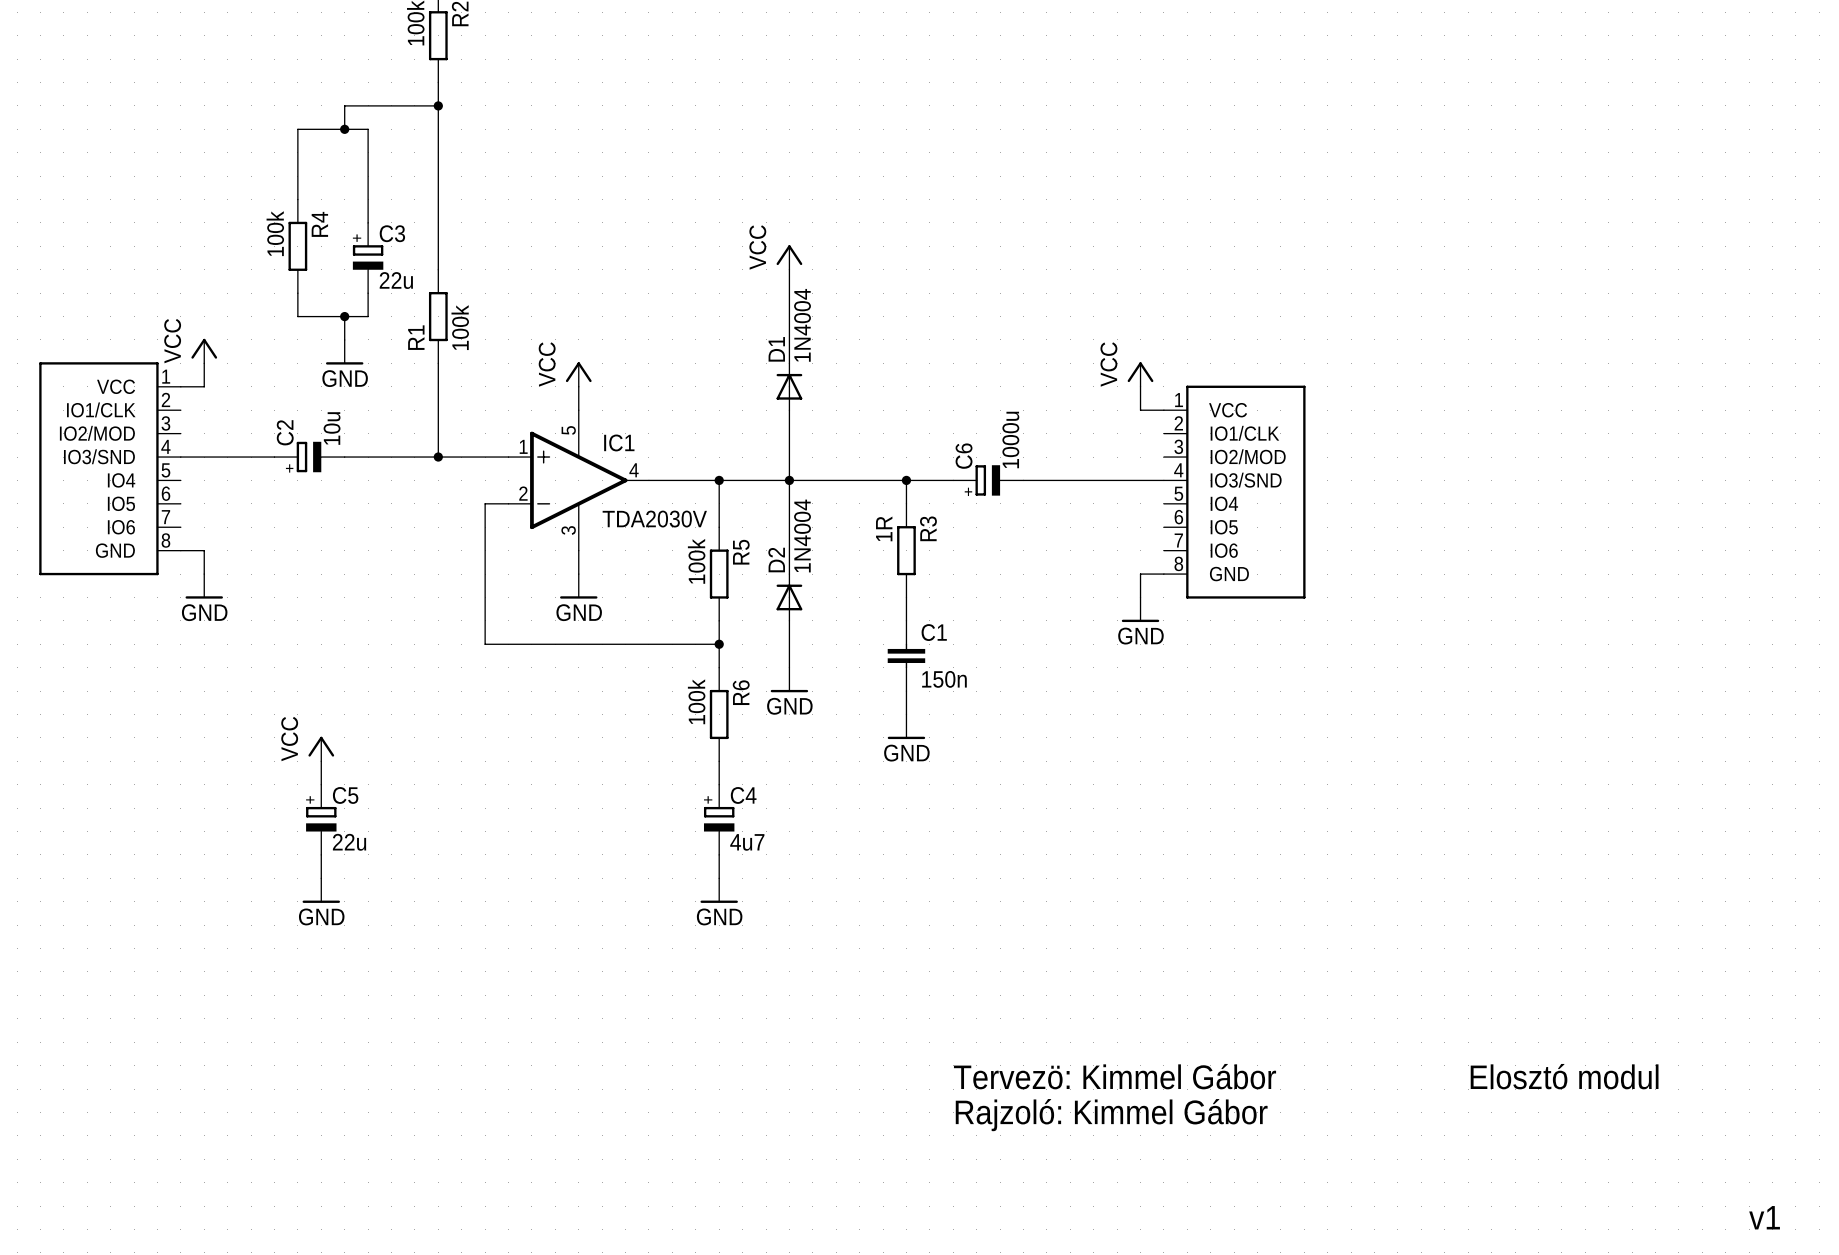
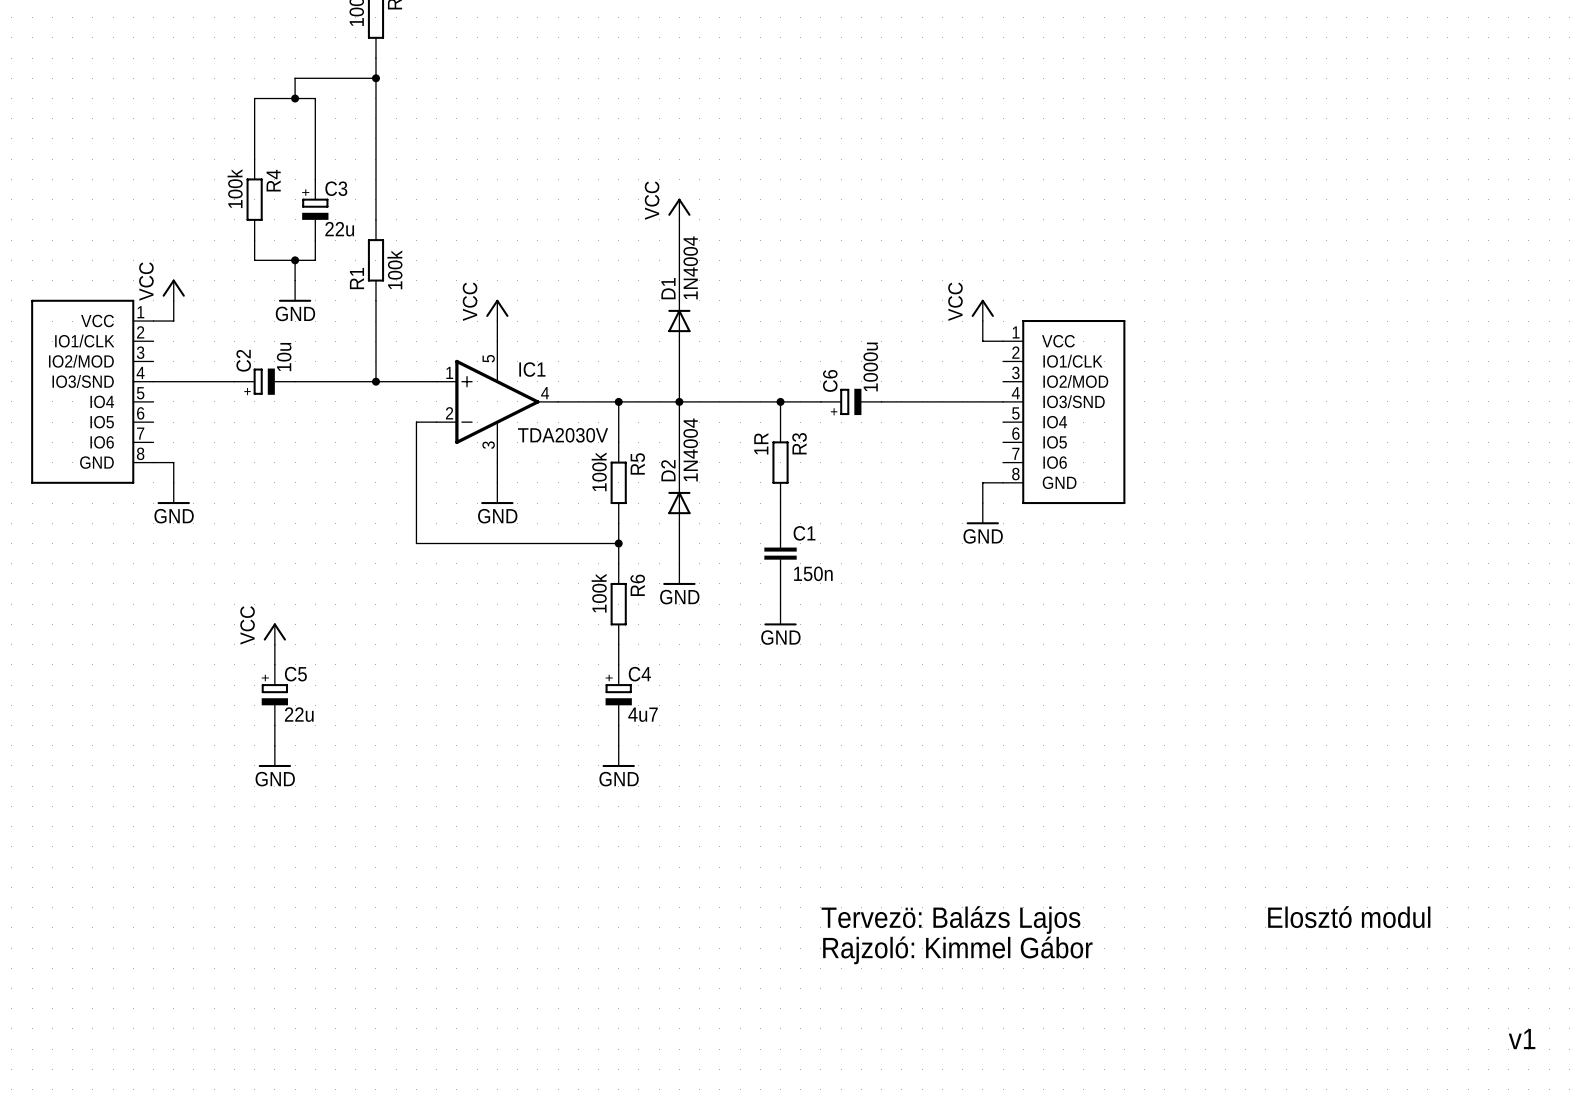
text: Tervezö: Kimmel Gábor (1115, 1076) -> Tervezö: Balázs Lajos (950, 920)

